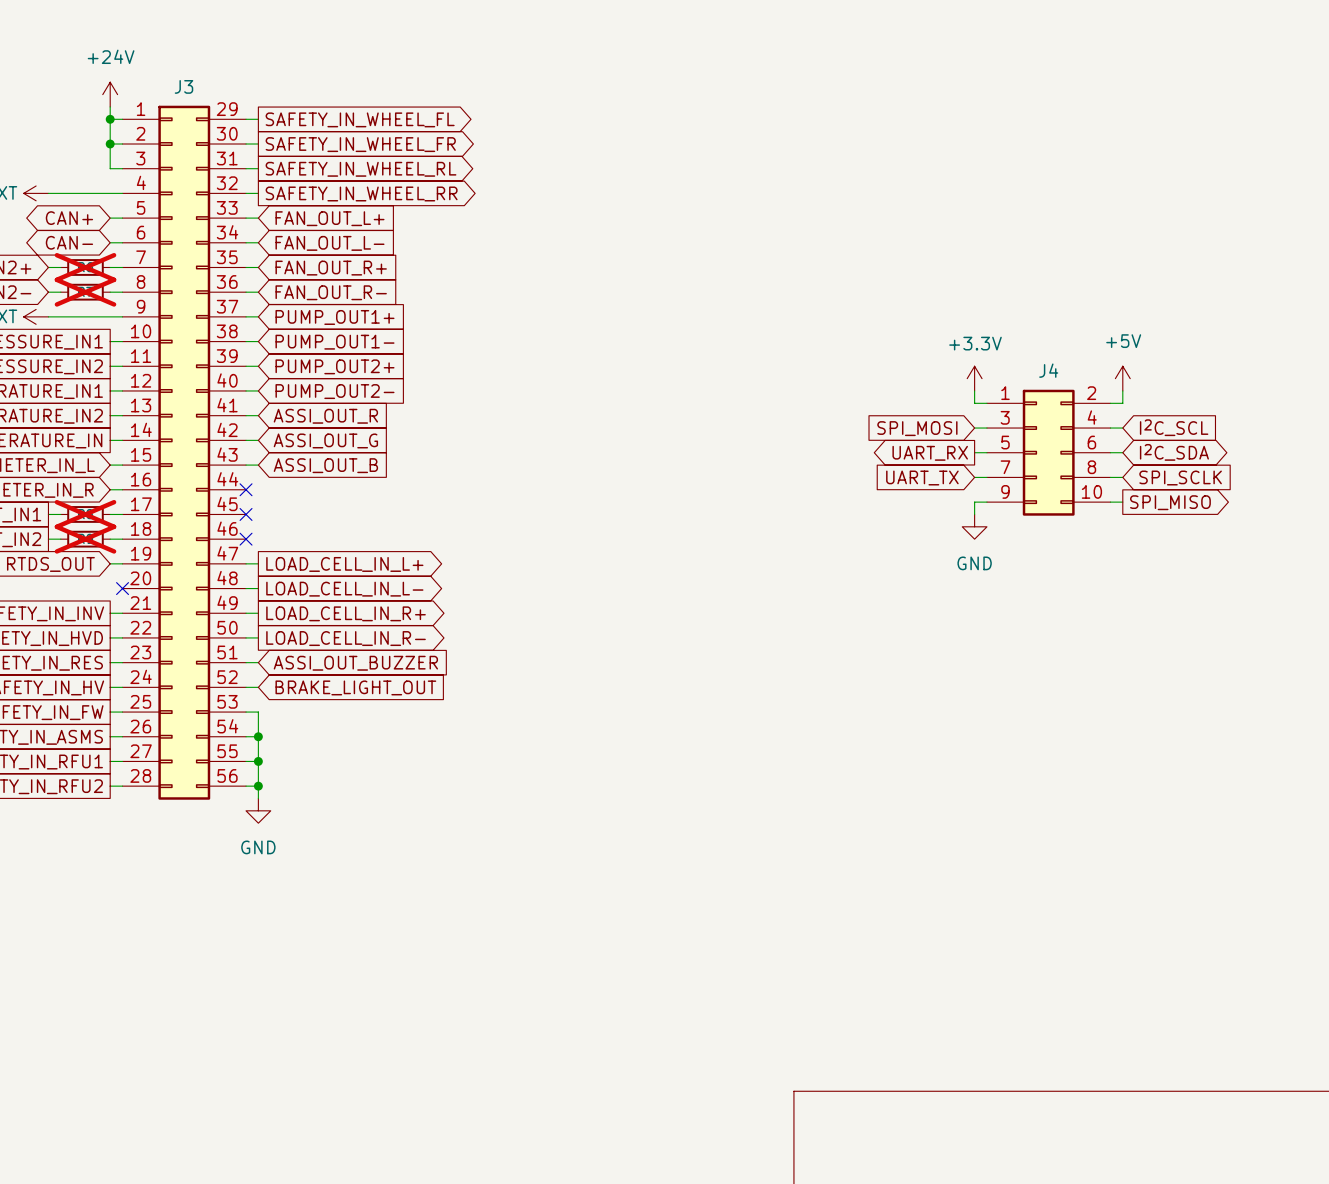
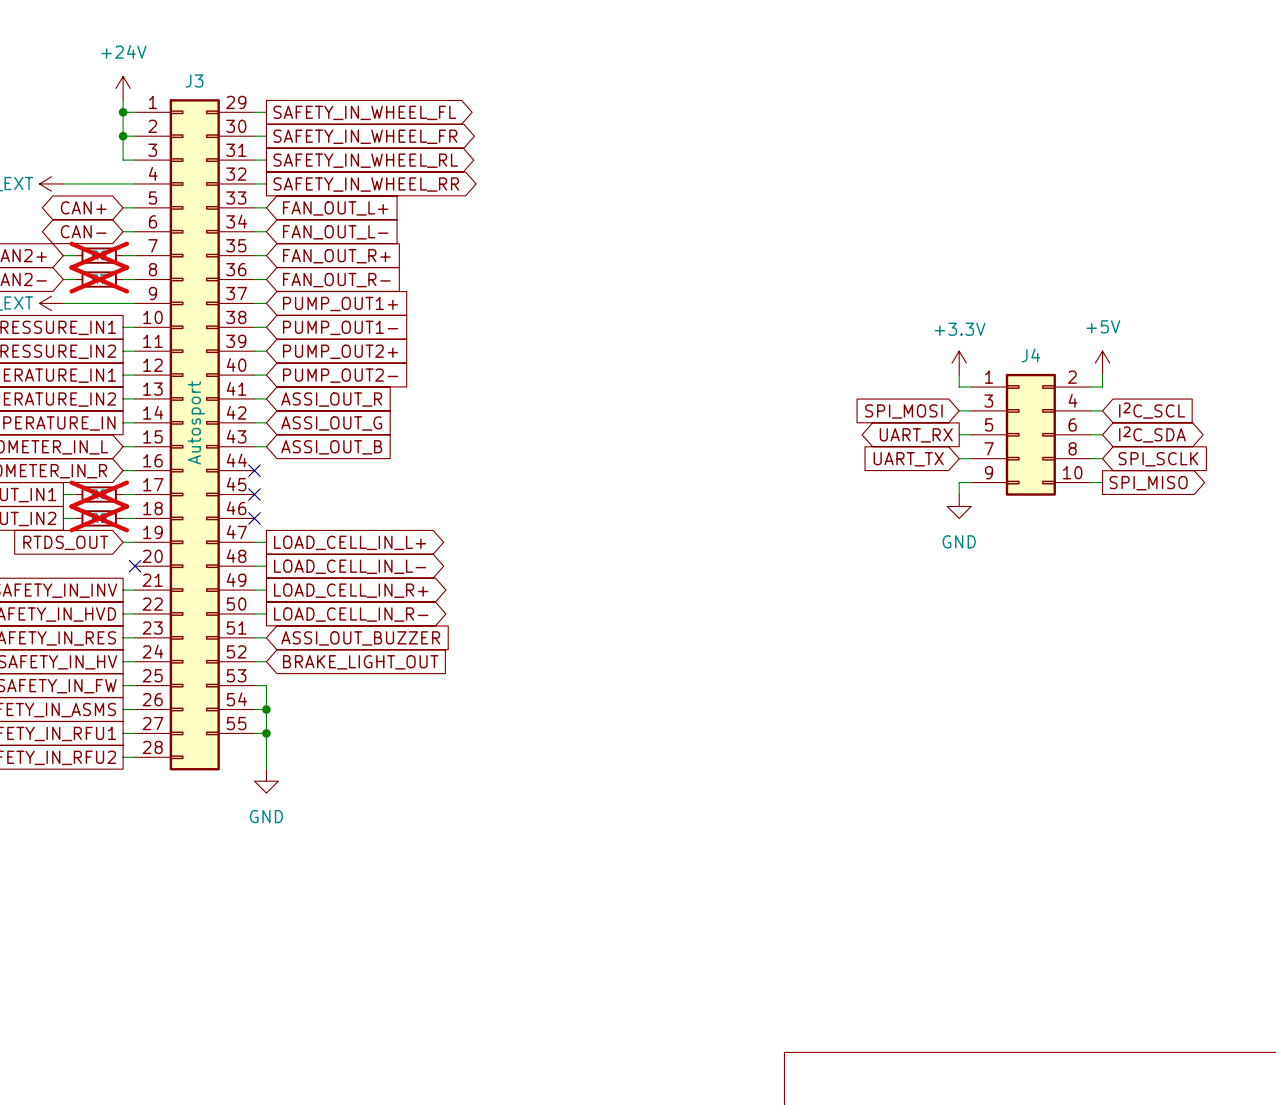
J3 symbol: [122, 105, 247, 800] -> [135, 99, 255, 771]
J3 value: none -> Autosport (196, 422)
wire: (246, 786) (258, 786) -> none
junction: (258, 786) -> none

